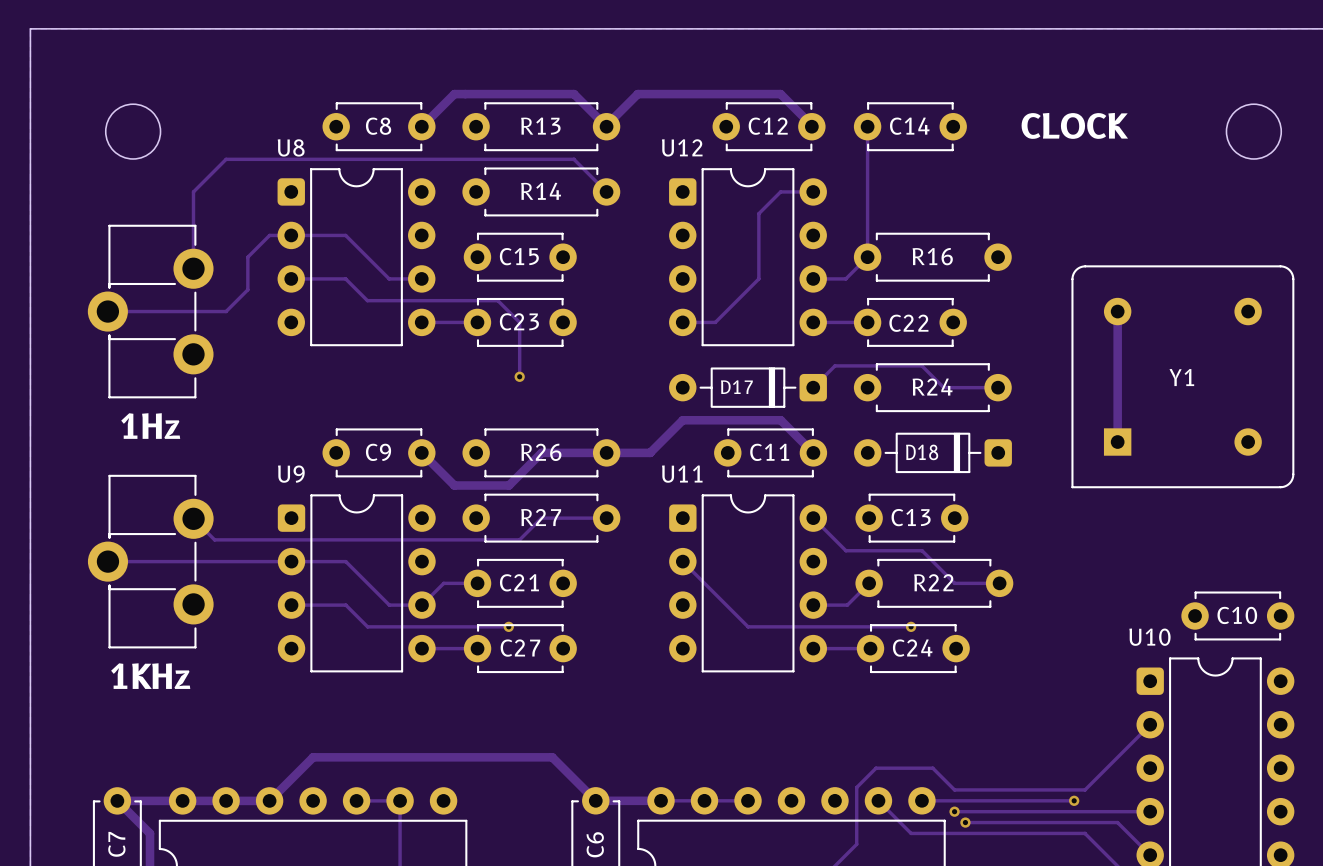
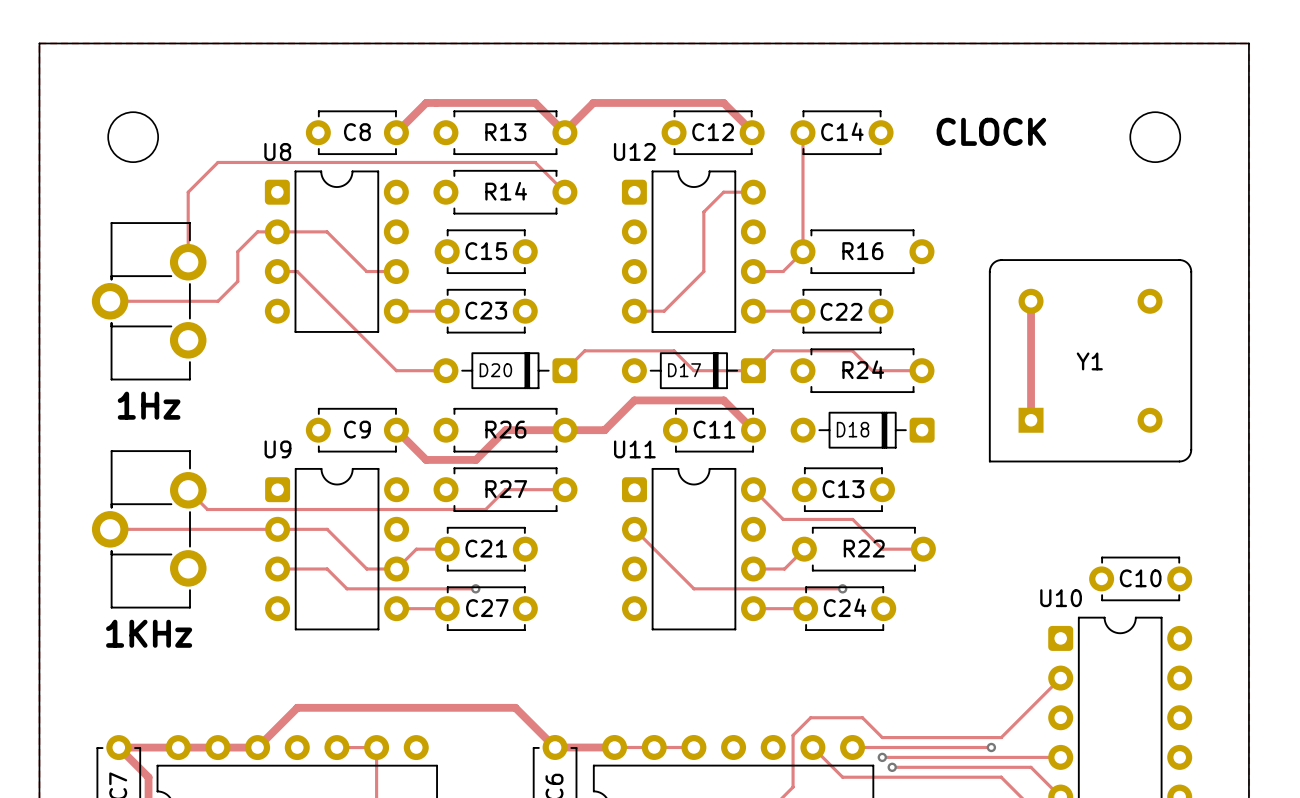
track: (313, 278) (345, 278) (367, 300) (497, 300) (519, 322) (519, 376) -> (297, 271) (396, 370) (445, 370)
via: (519, 376) -> none
D20: none -> (505, 370)
track: none -> (564, 370) (584, 350) (674, 350) (693, 370) (753, 370)

